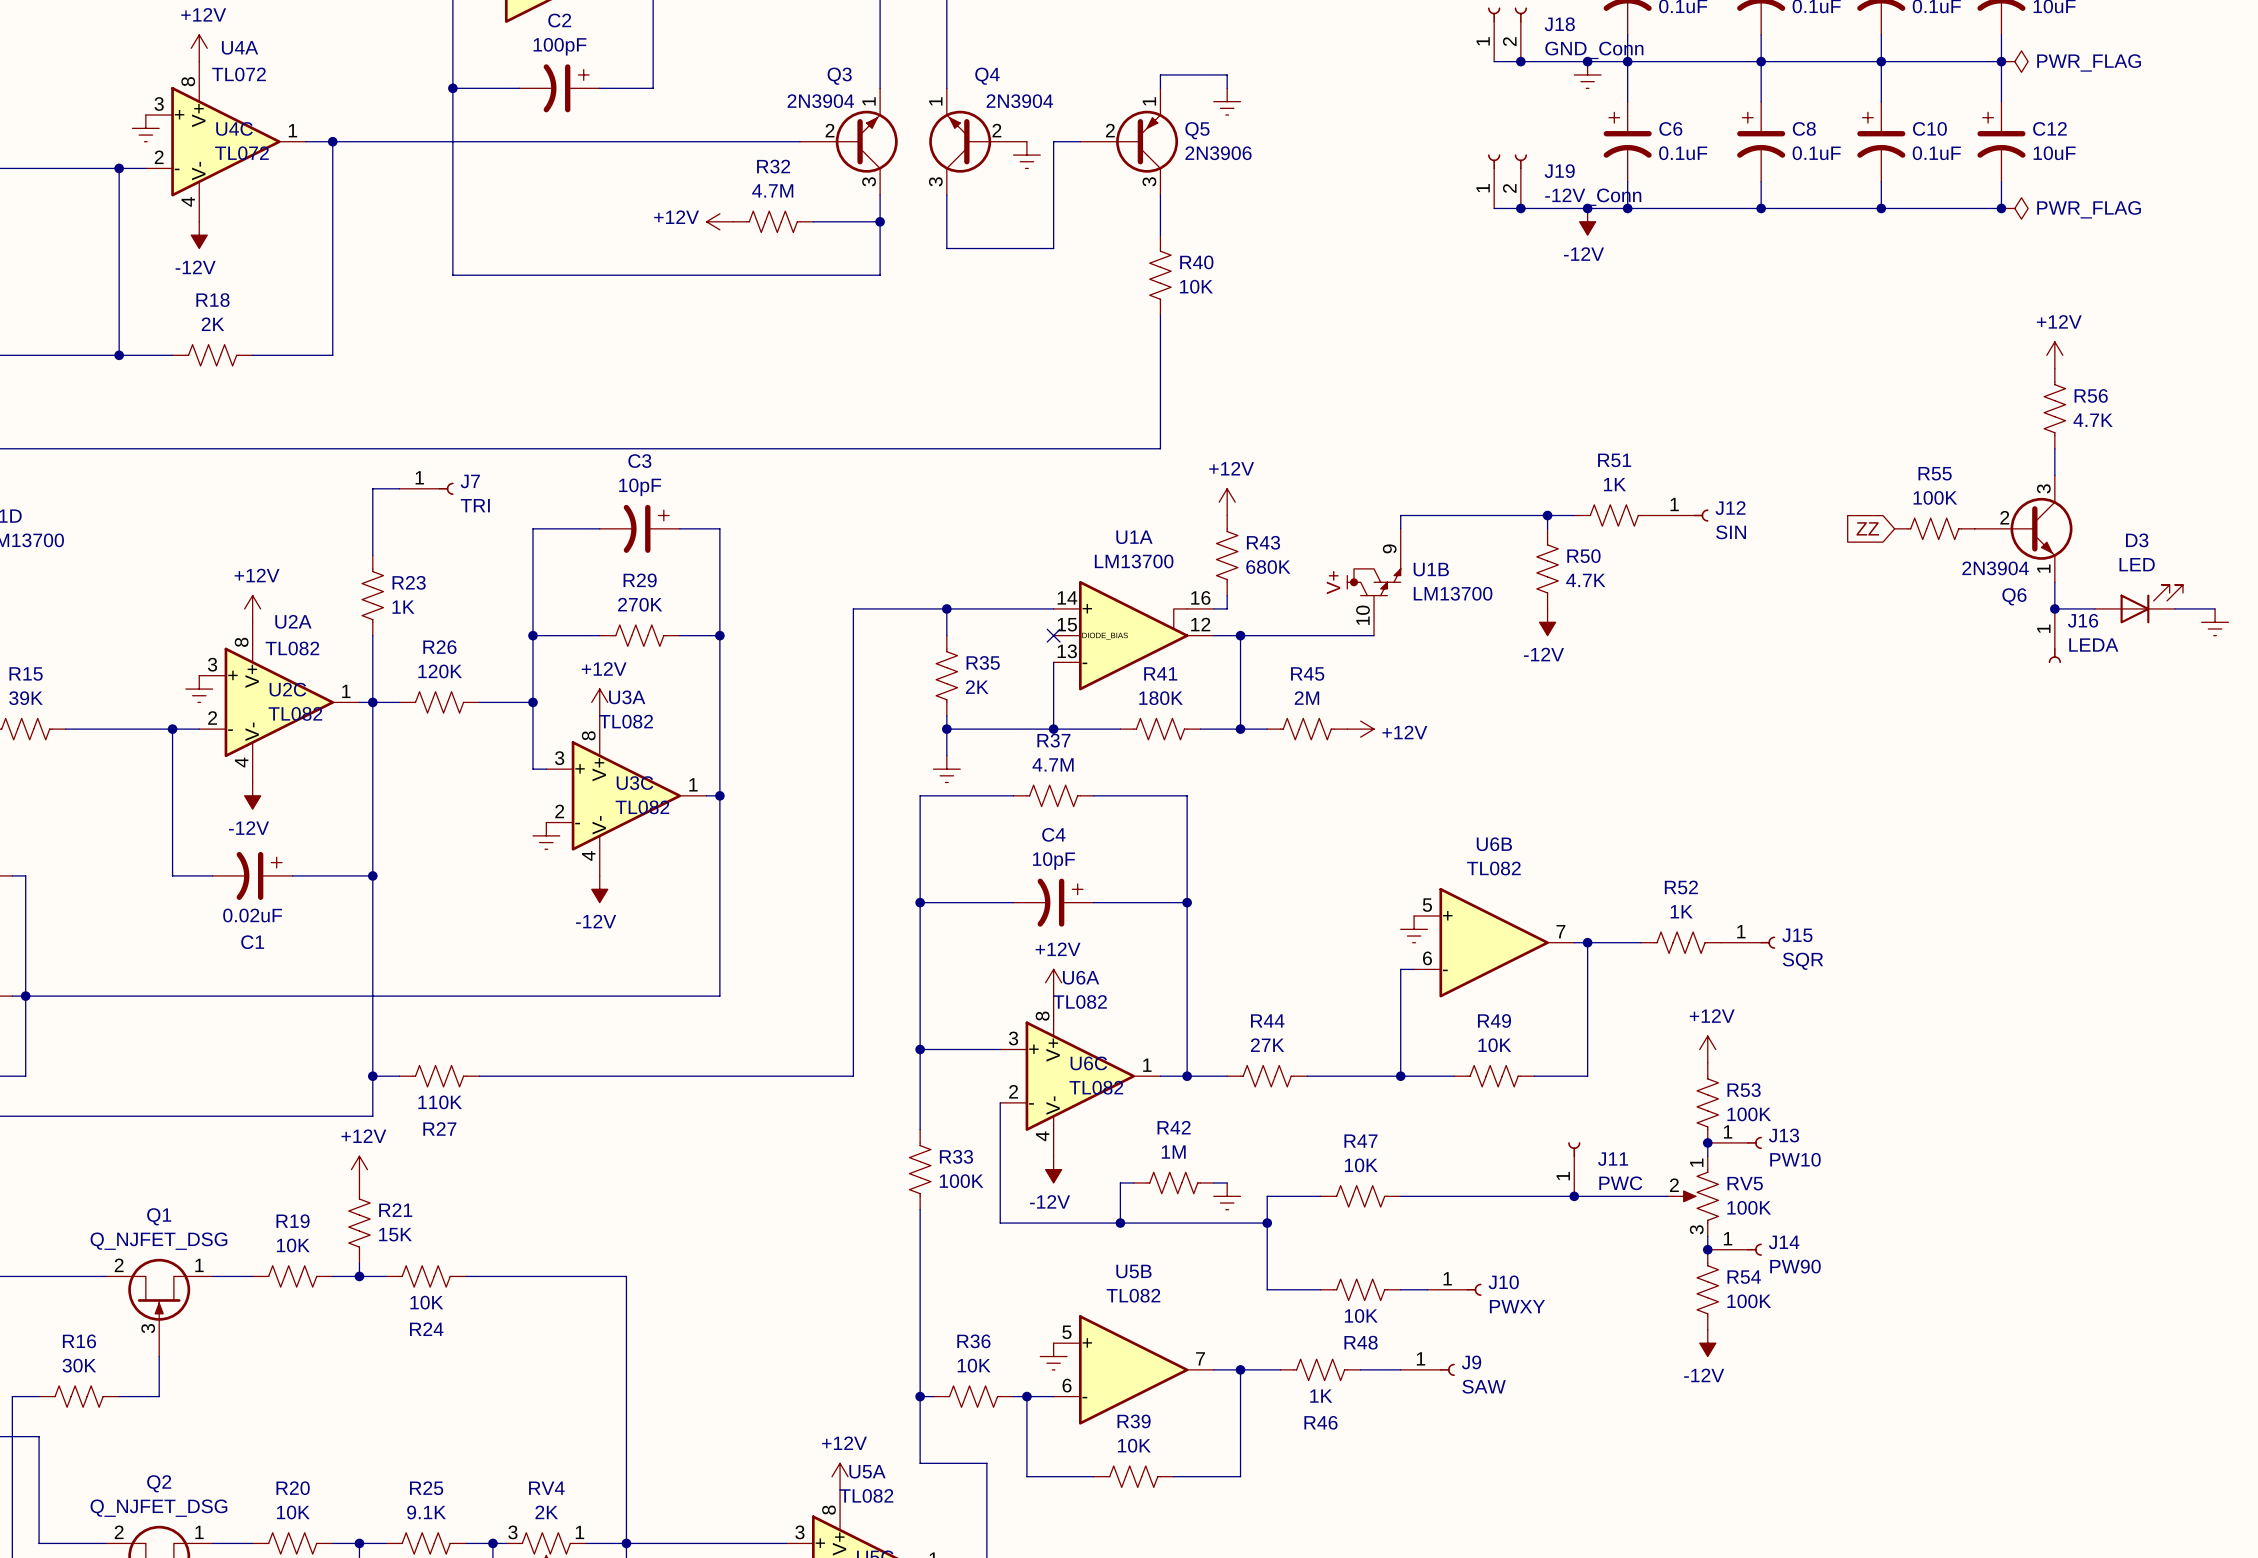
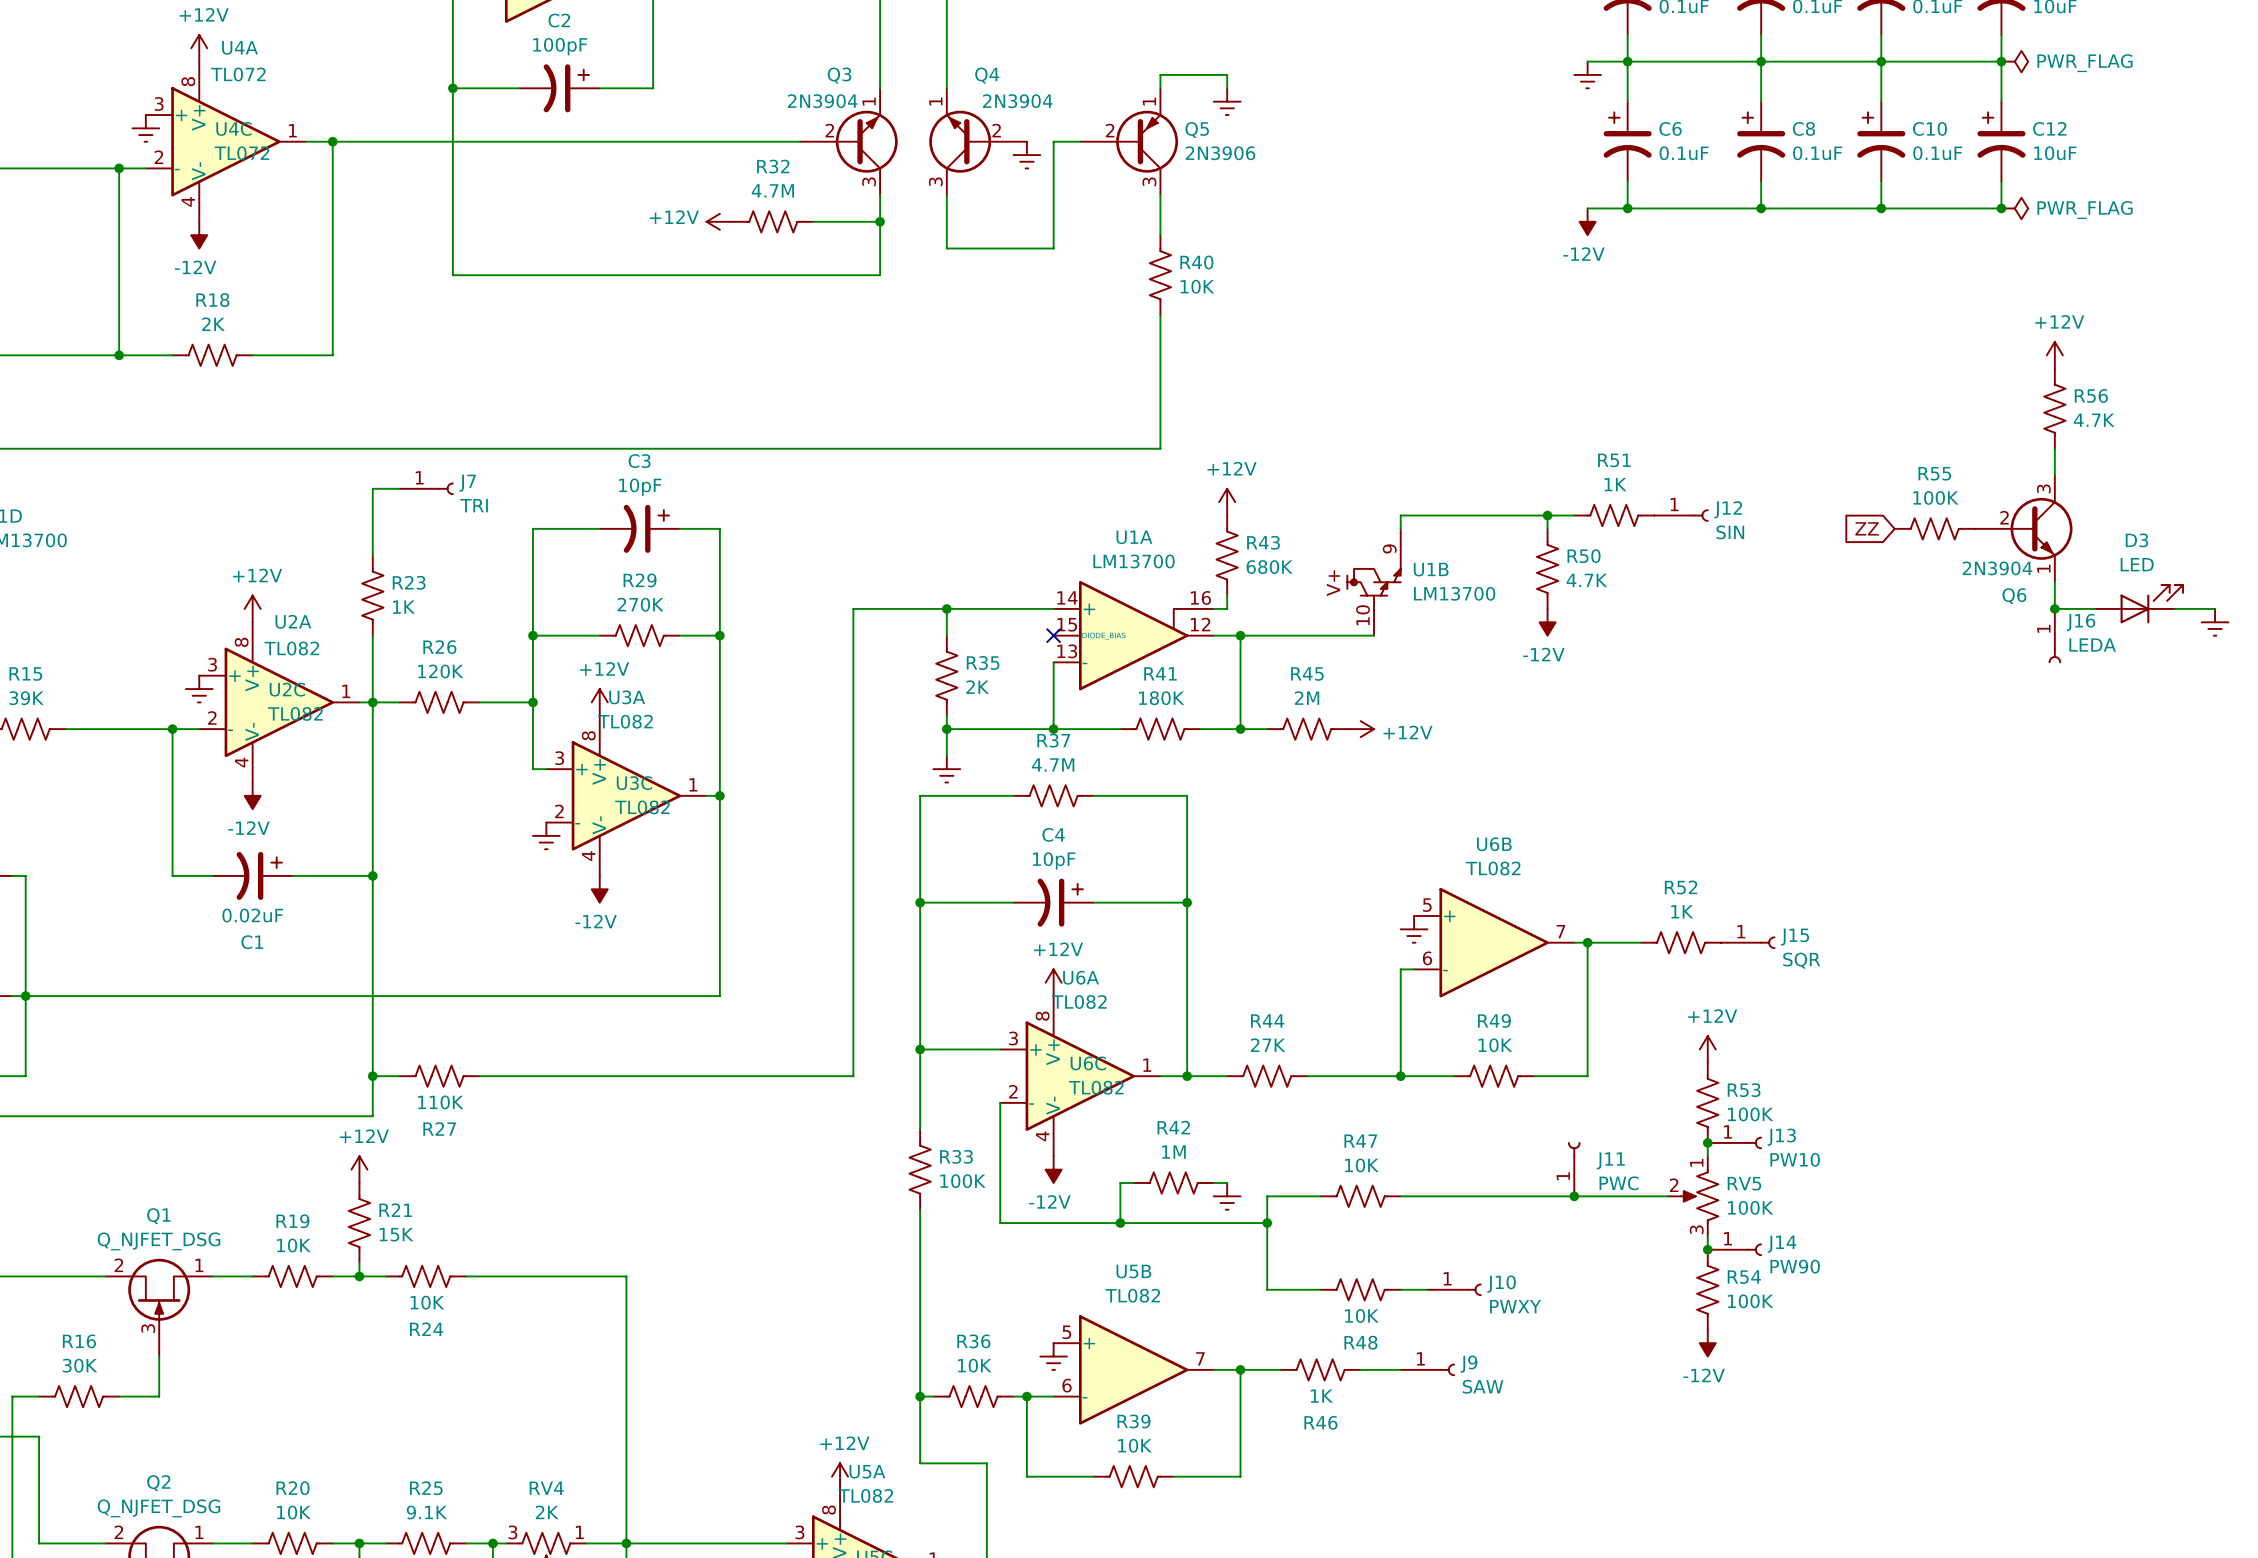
J18: GND_Conn (1507, 34) -> none
wire: (1494, 61) (1587, 61) -> none
junction: (1520, 61) -> none
junction: (1587, 61) -> none
J19: -12V_Conn (1507, 181) -> none
wire: (1494, 208) (1587, 208) -> none
junction: (1520, 208) -> none
junction: (1587, 208) -> none

